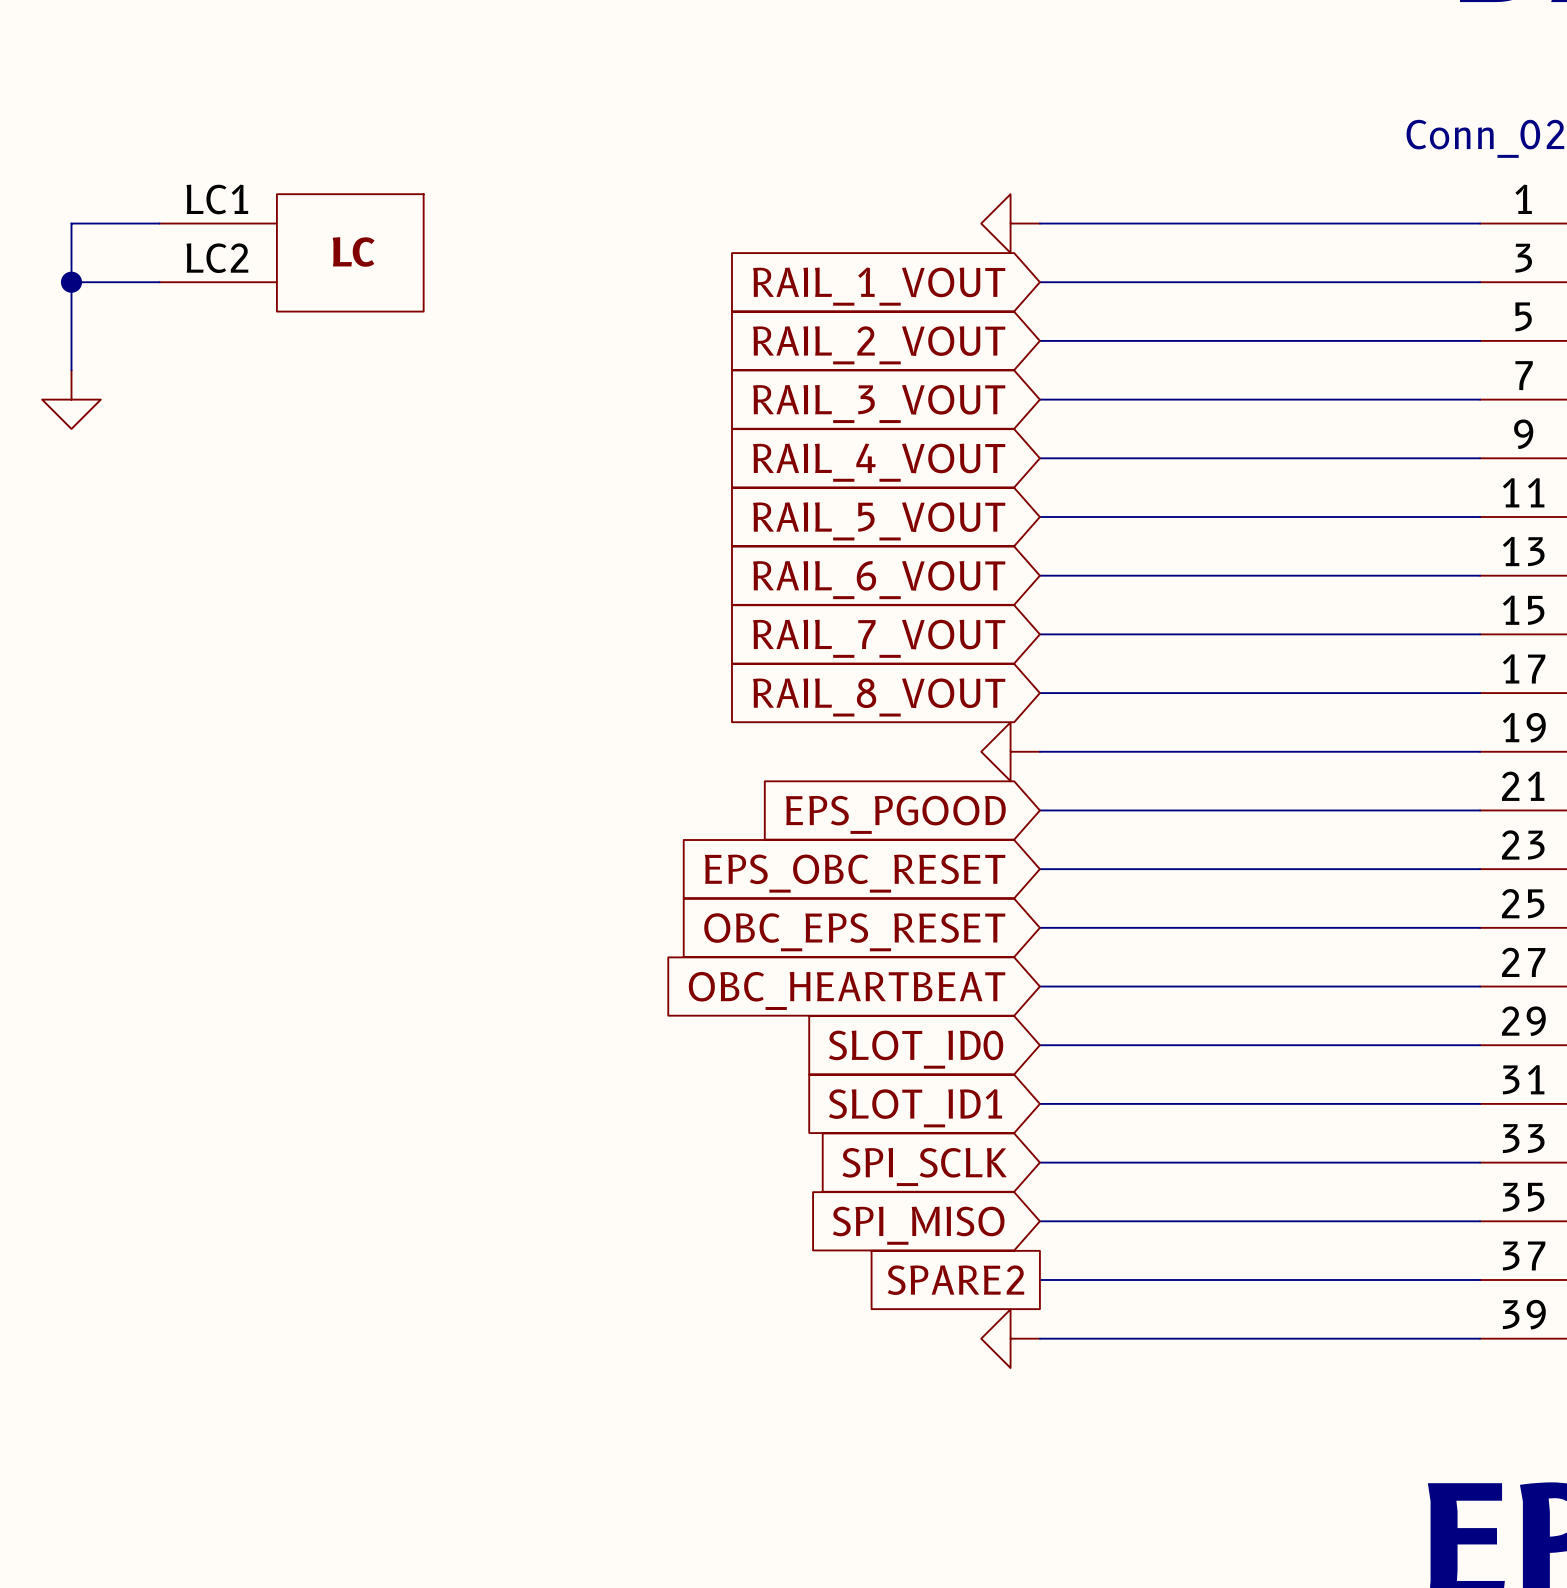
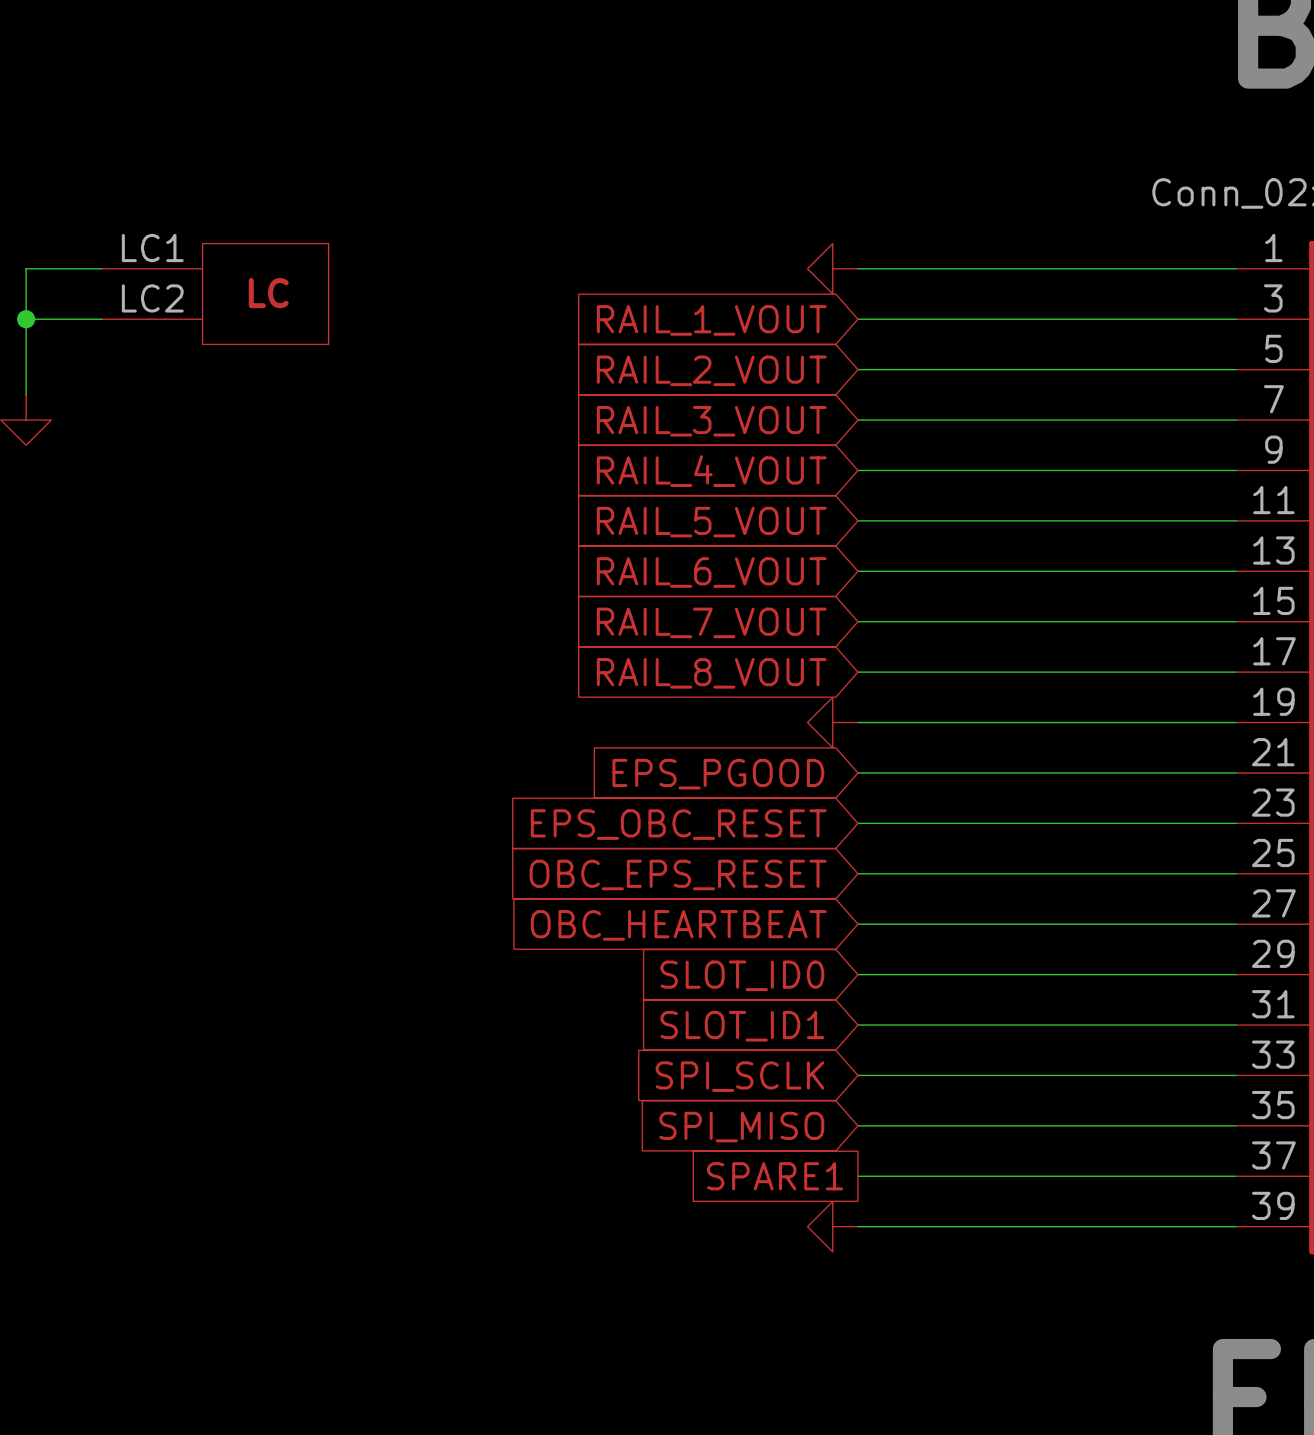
global label: SPARE2 (955, 1280) -> SPARE1 (775, 1176)

